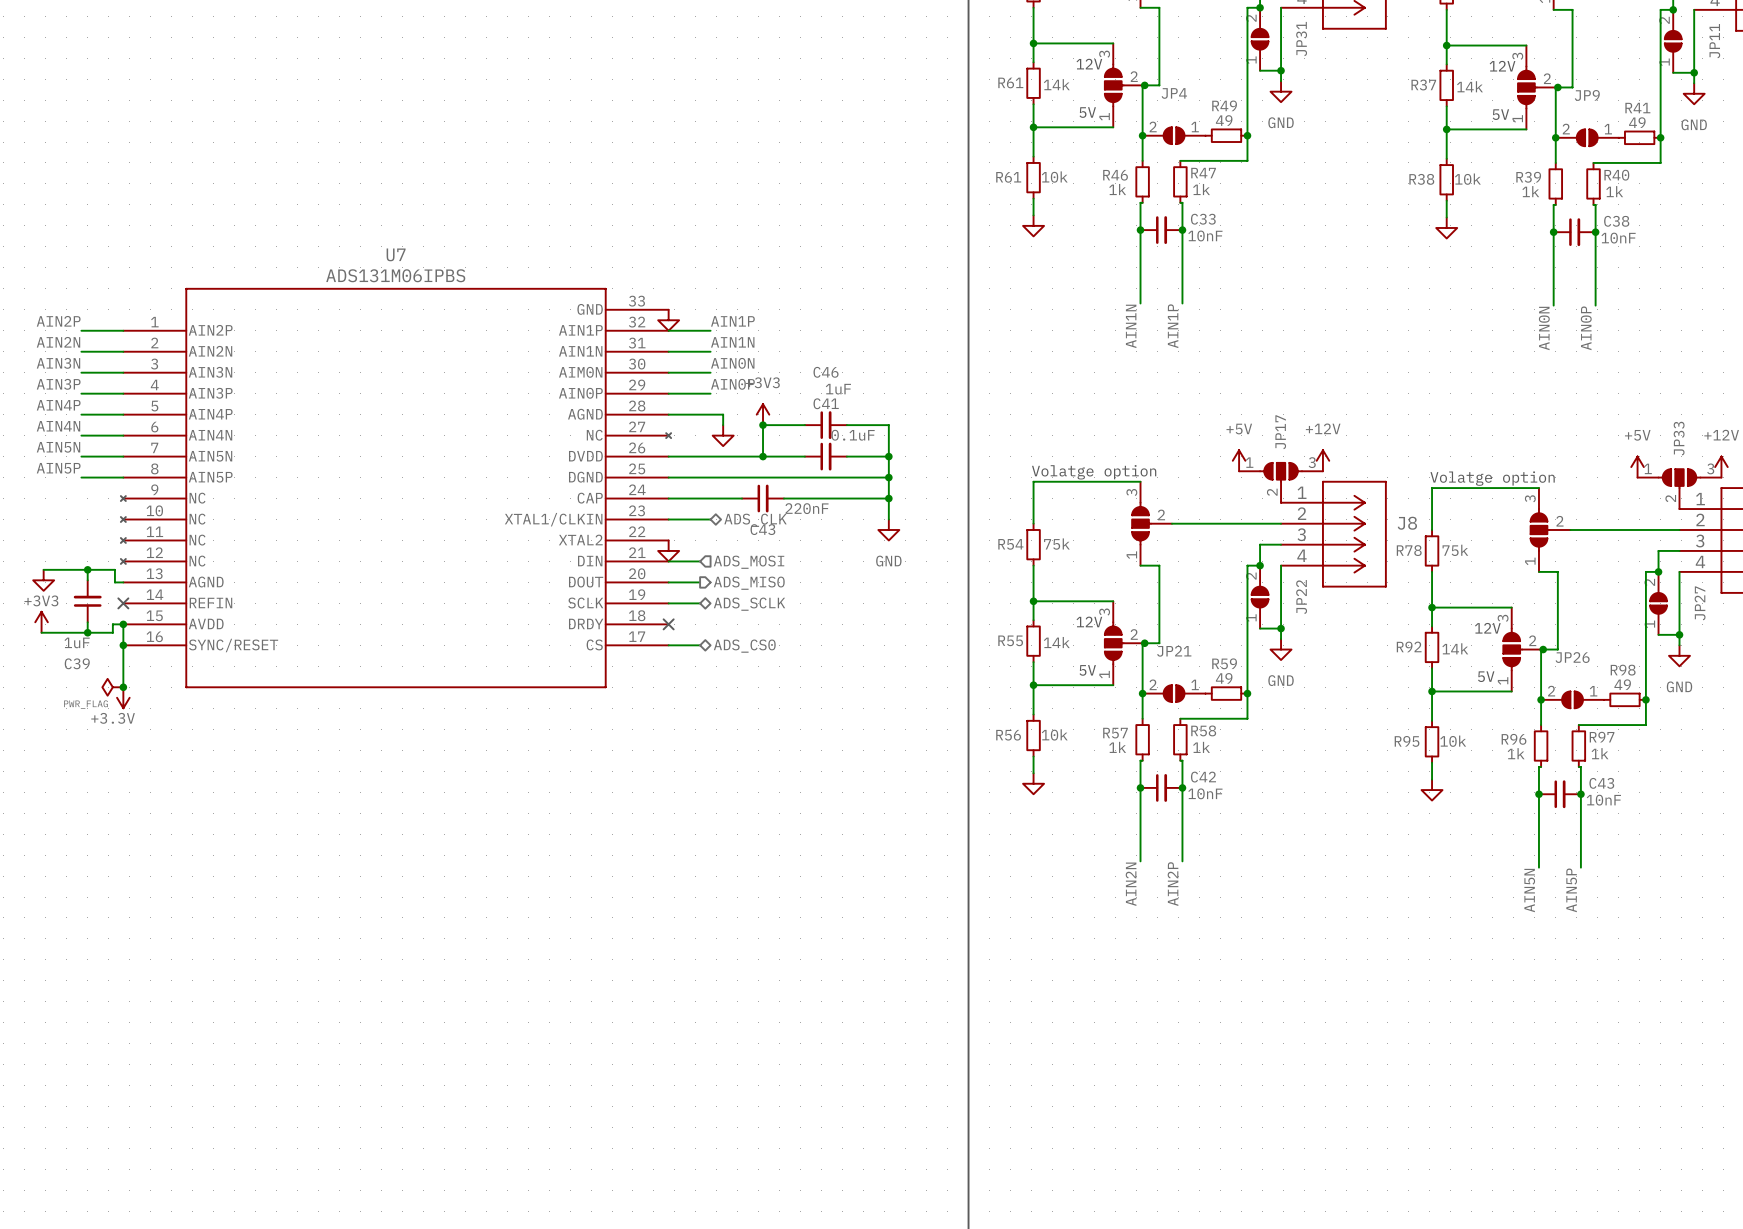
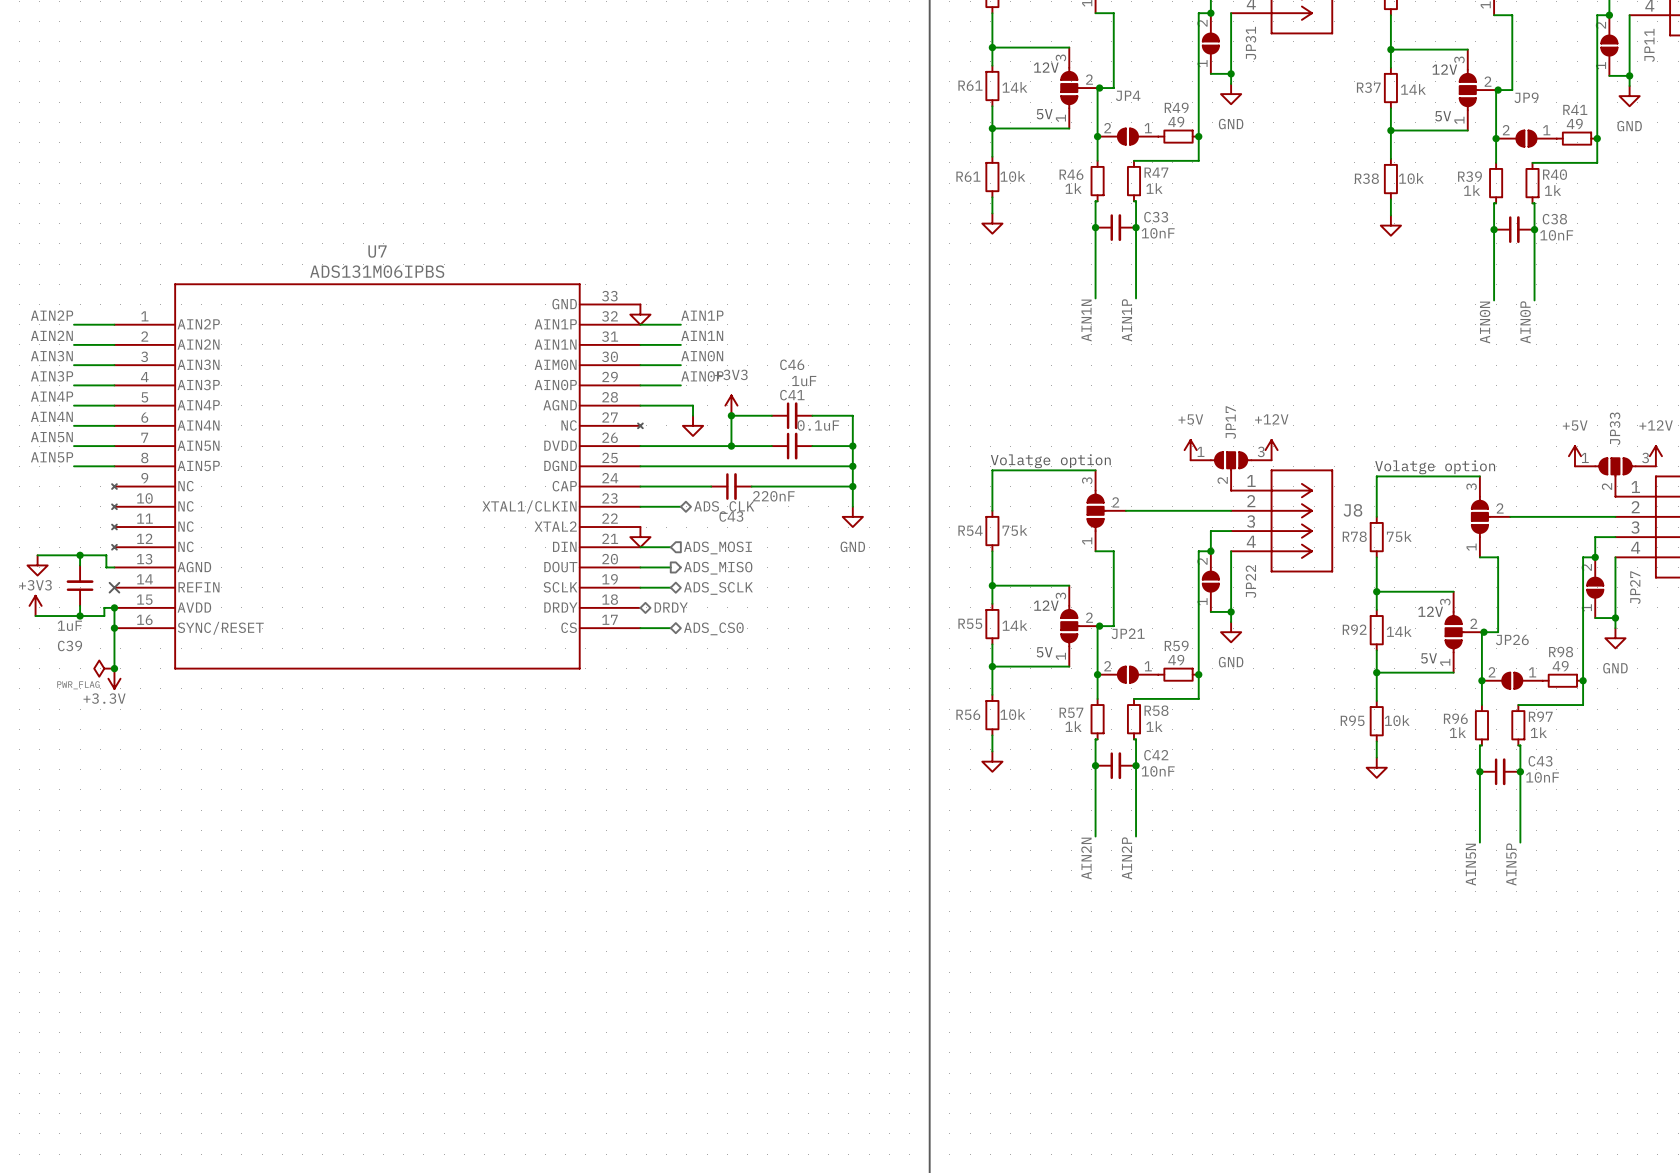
hierarchical label: none -> DRDY (671, 607)
no-connect mark: (668, 624) -> none

